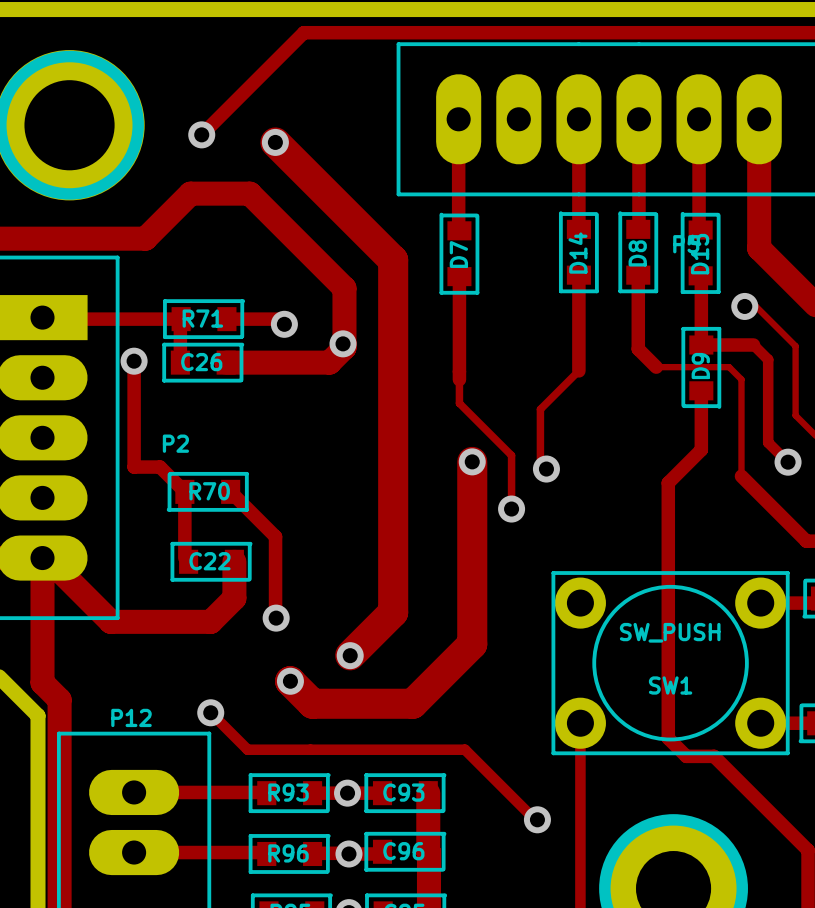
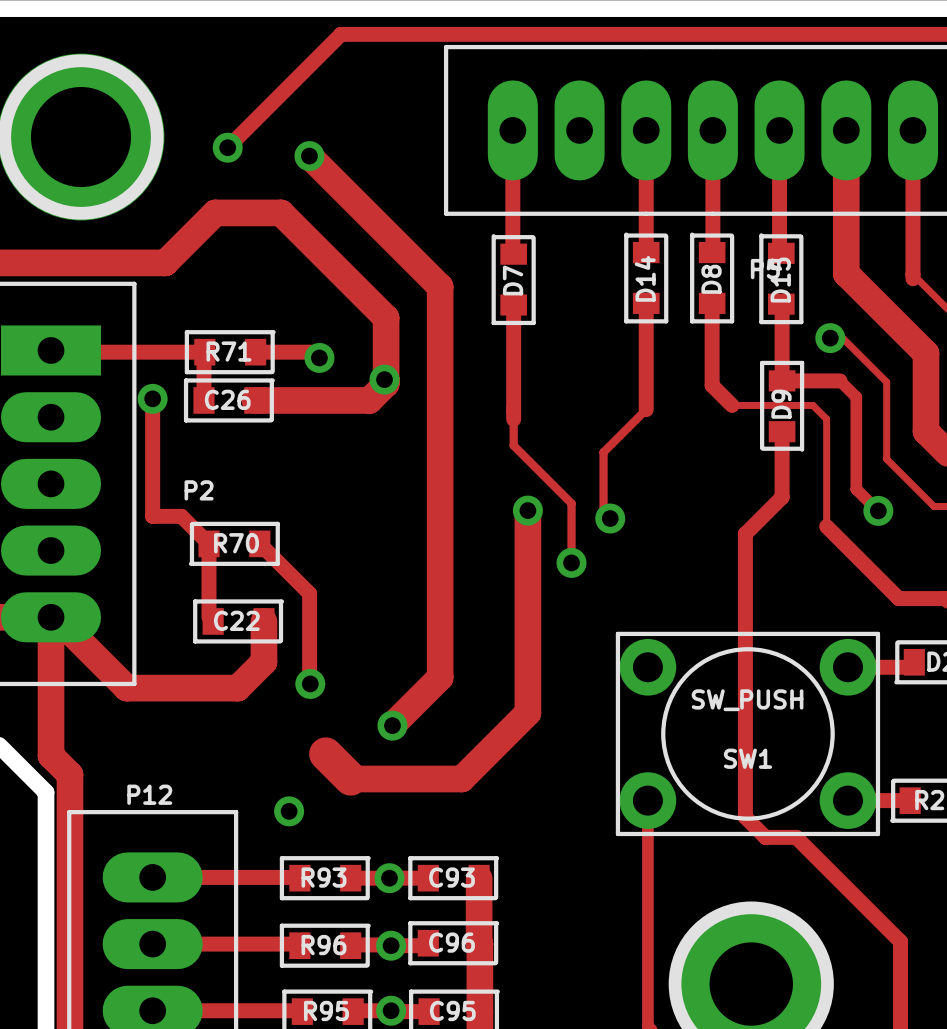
track width: thick (275, 142) (393, 260) (393, 612) (350, 655) -> thin (309, 156) (440, 286) (440, 677) (392, 725)
track width: thick (472, 461) (472, 644) (412, 703) (312, 703) -> thin (527, 510) (527, 712) (461, 779) (350, 779)
via: (290, 681) -> none
track: (210, 712) (247, 749) (465, 749) (537, 822) (537, 819) -> none
via: (210, 712) -> none
via: none -> (289, 811)
via: (537, 819) -> none

